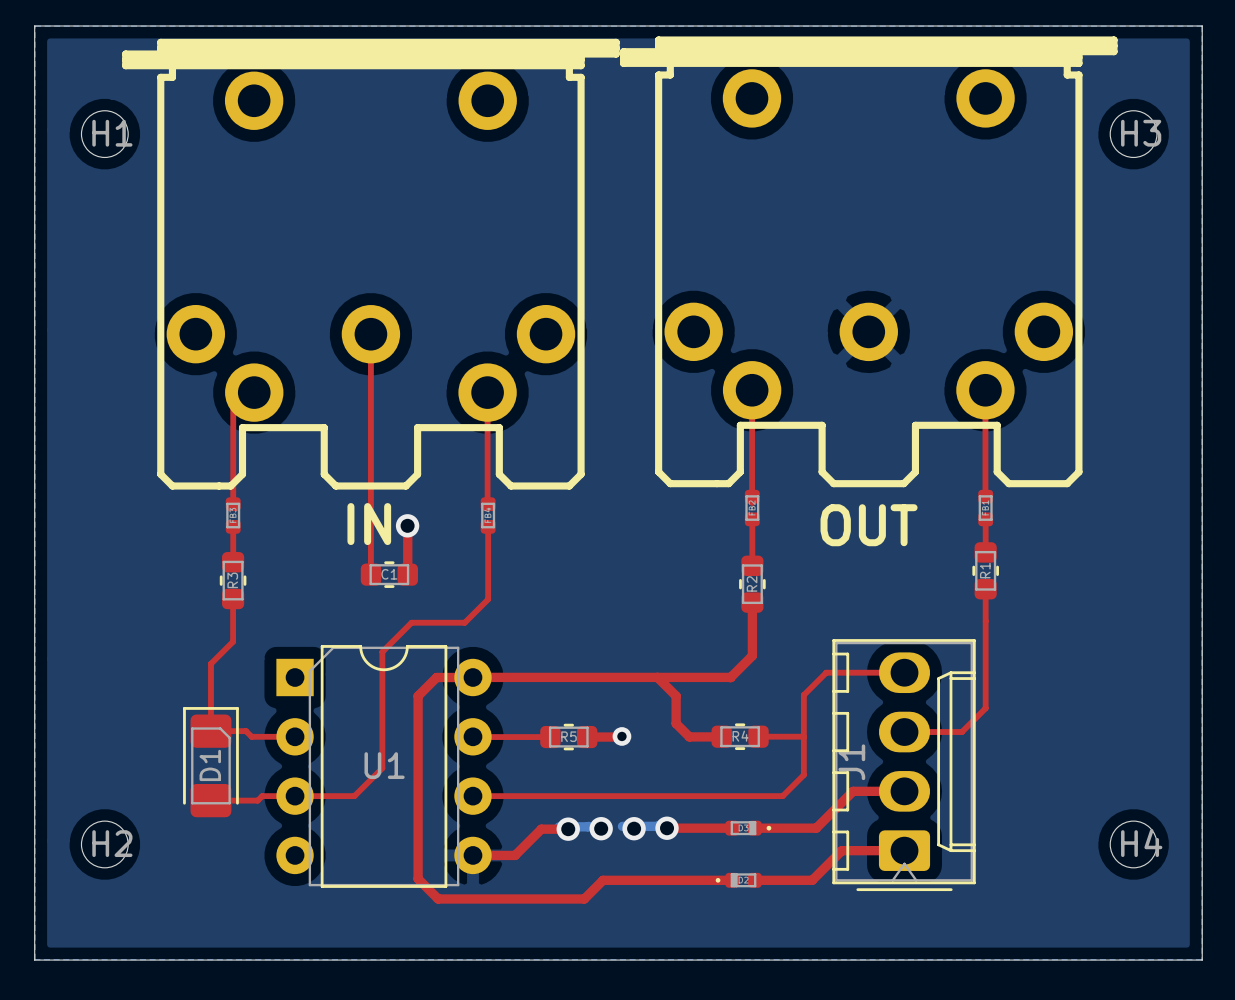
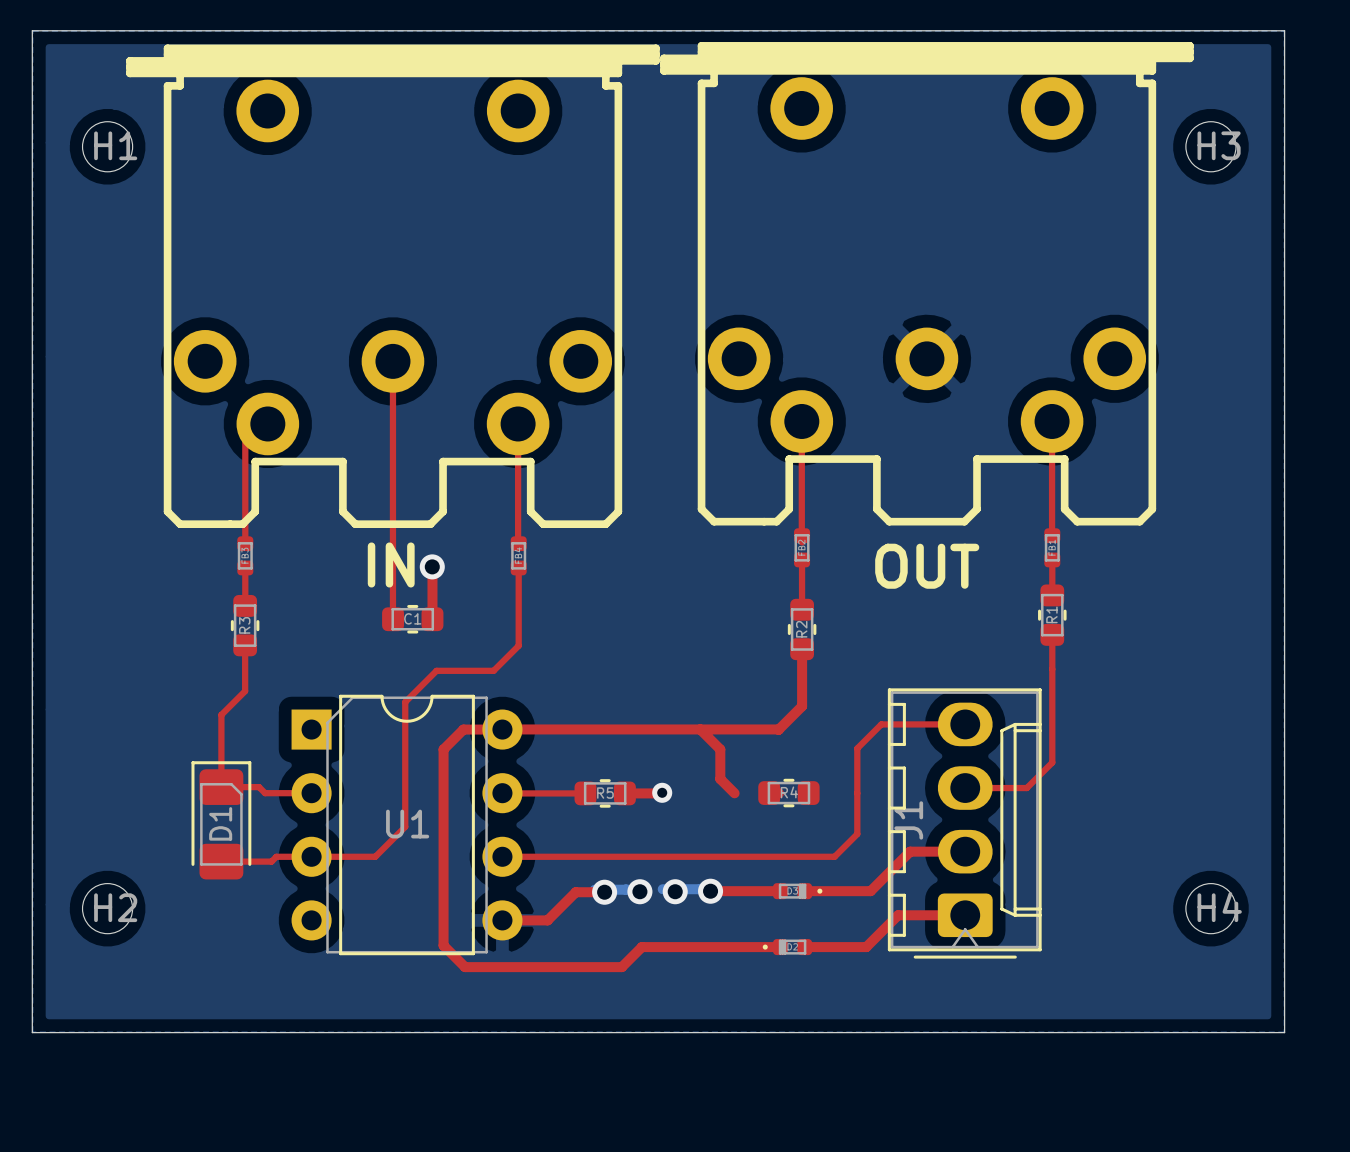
top track: (689, 736) (721, 736) -> none
top track: (758, 736) (803, 736) -> none

